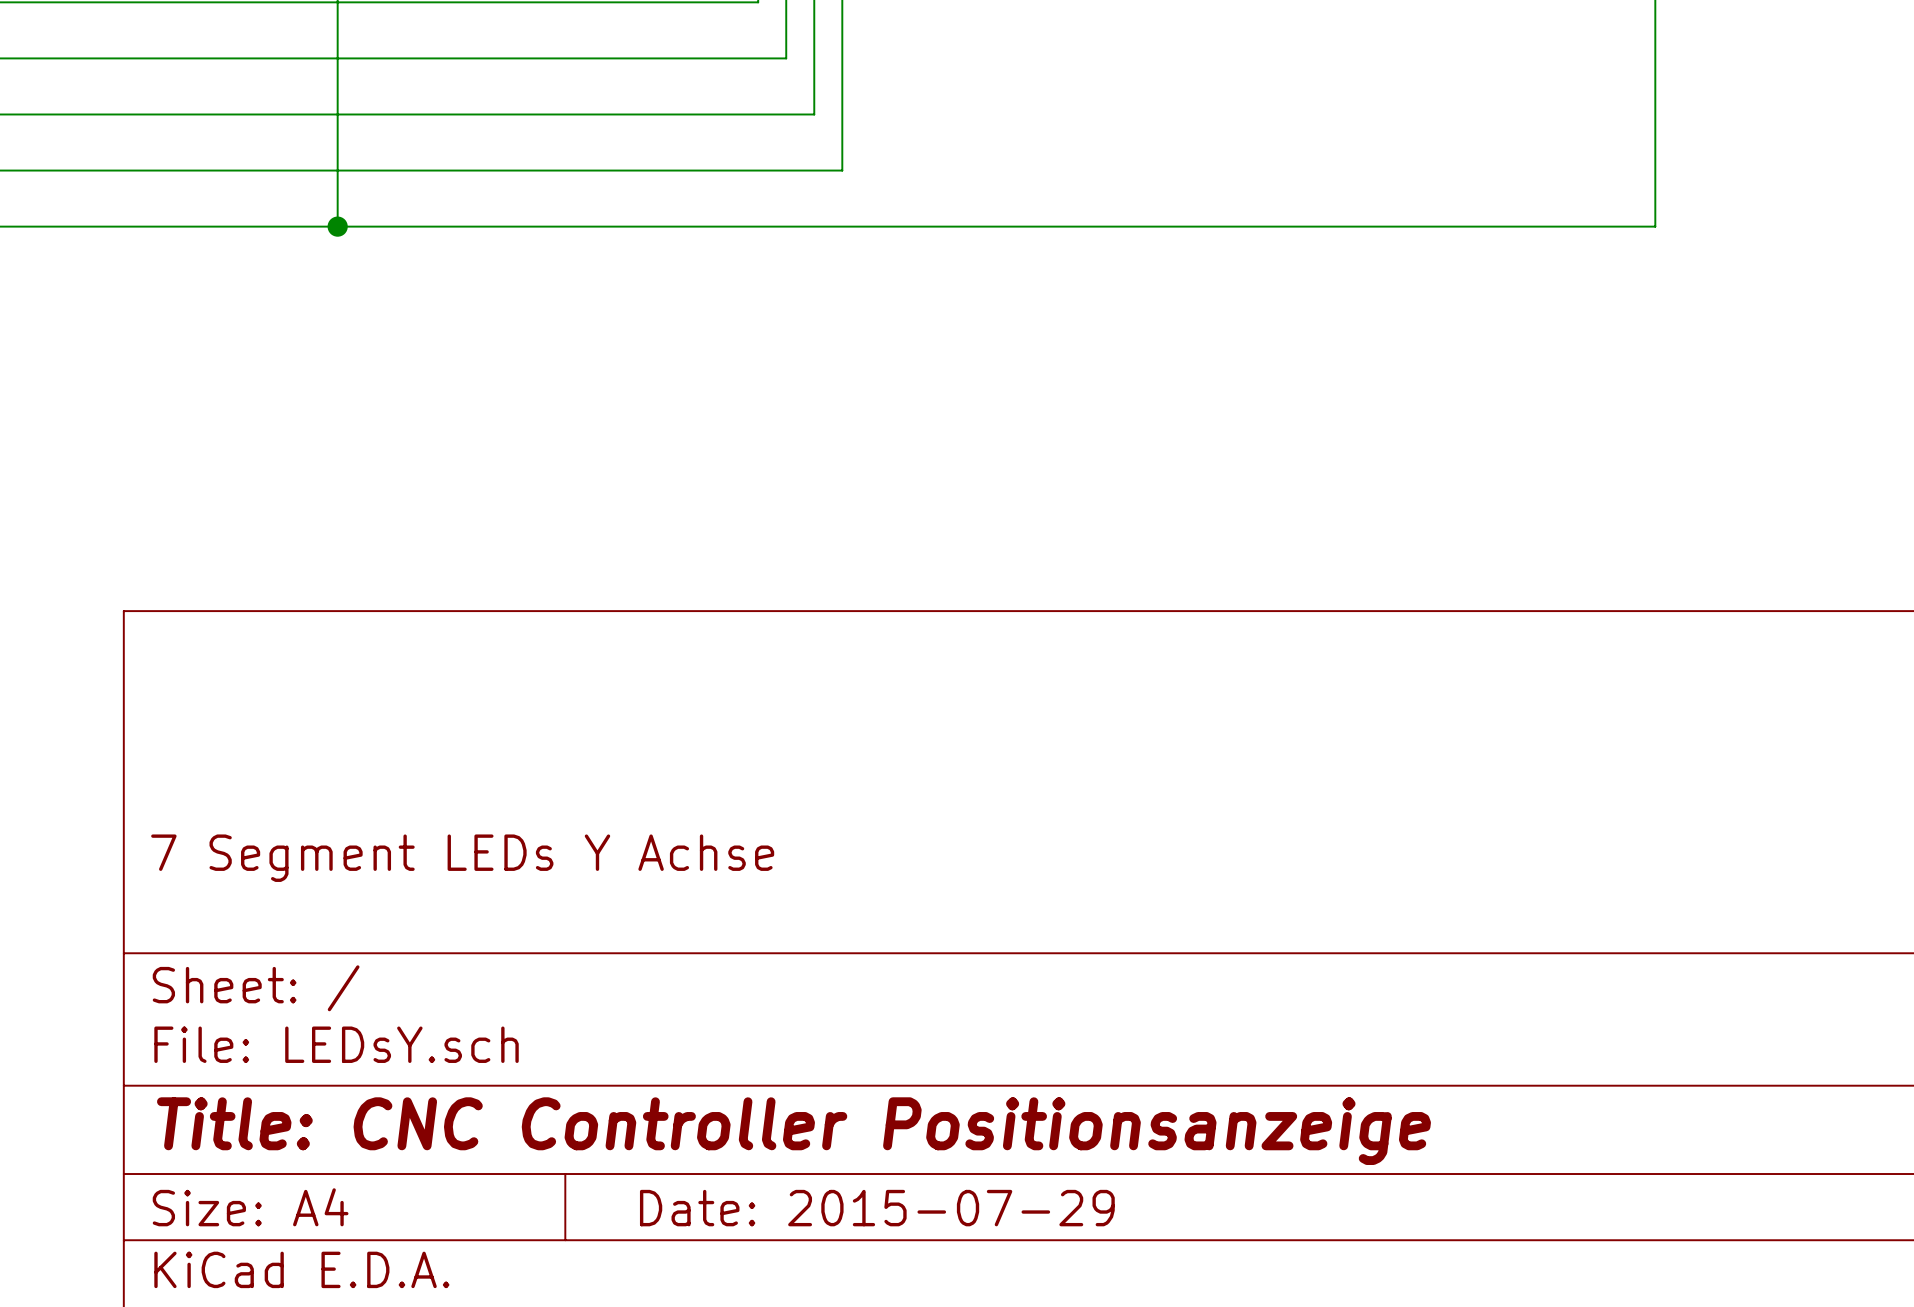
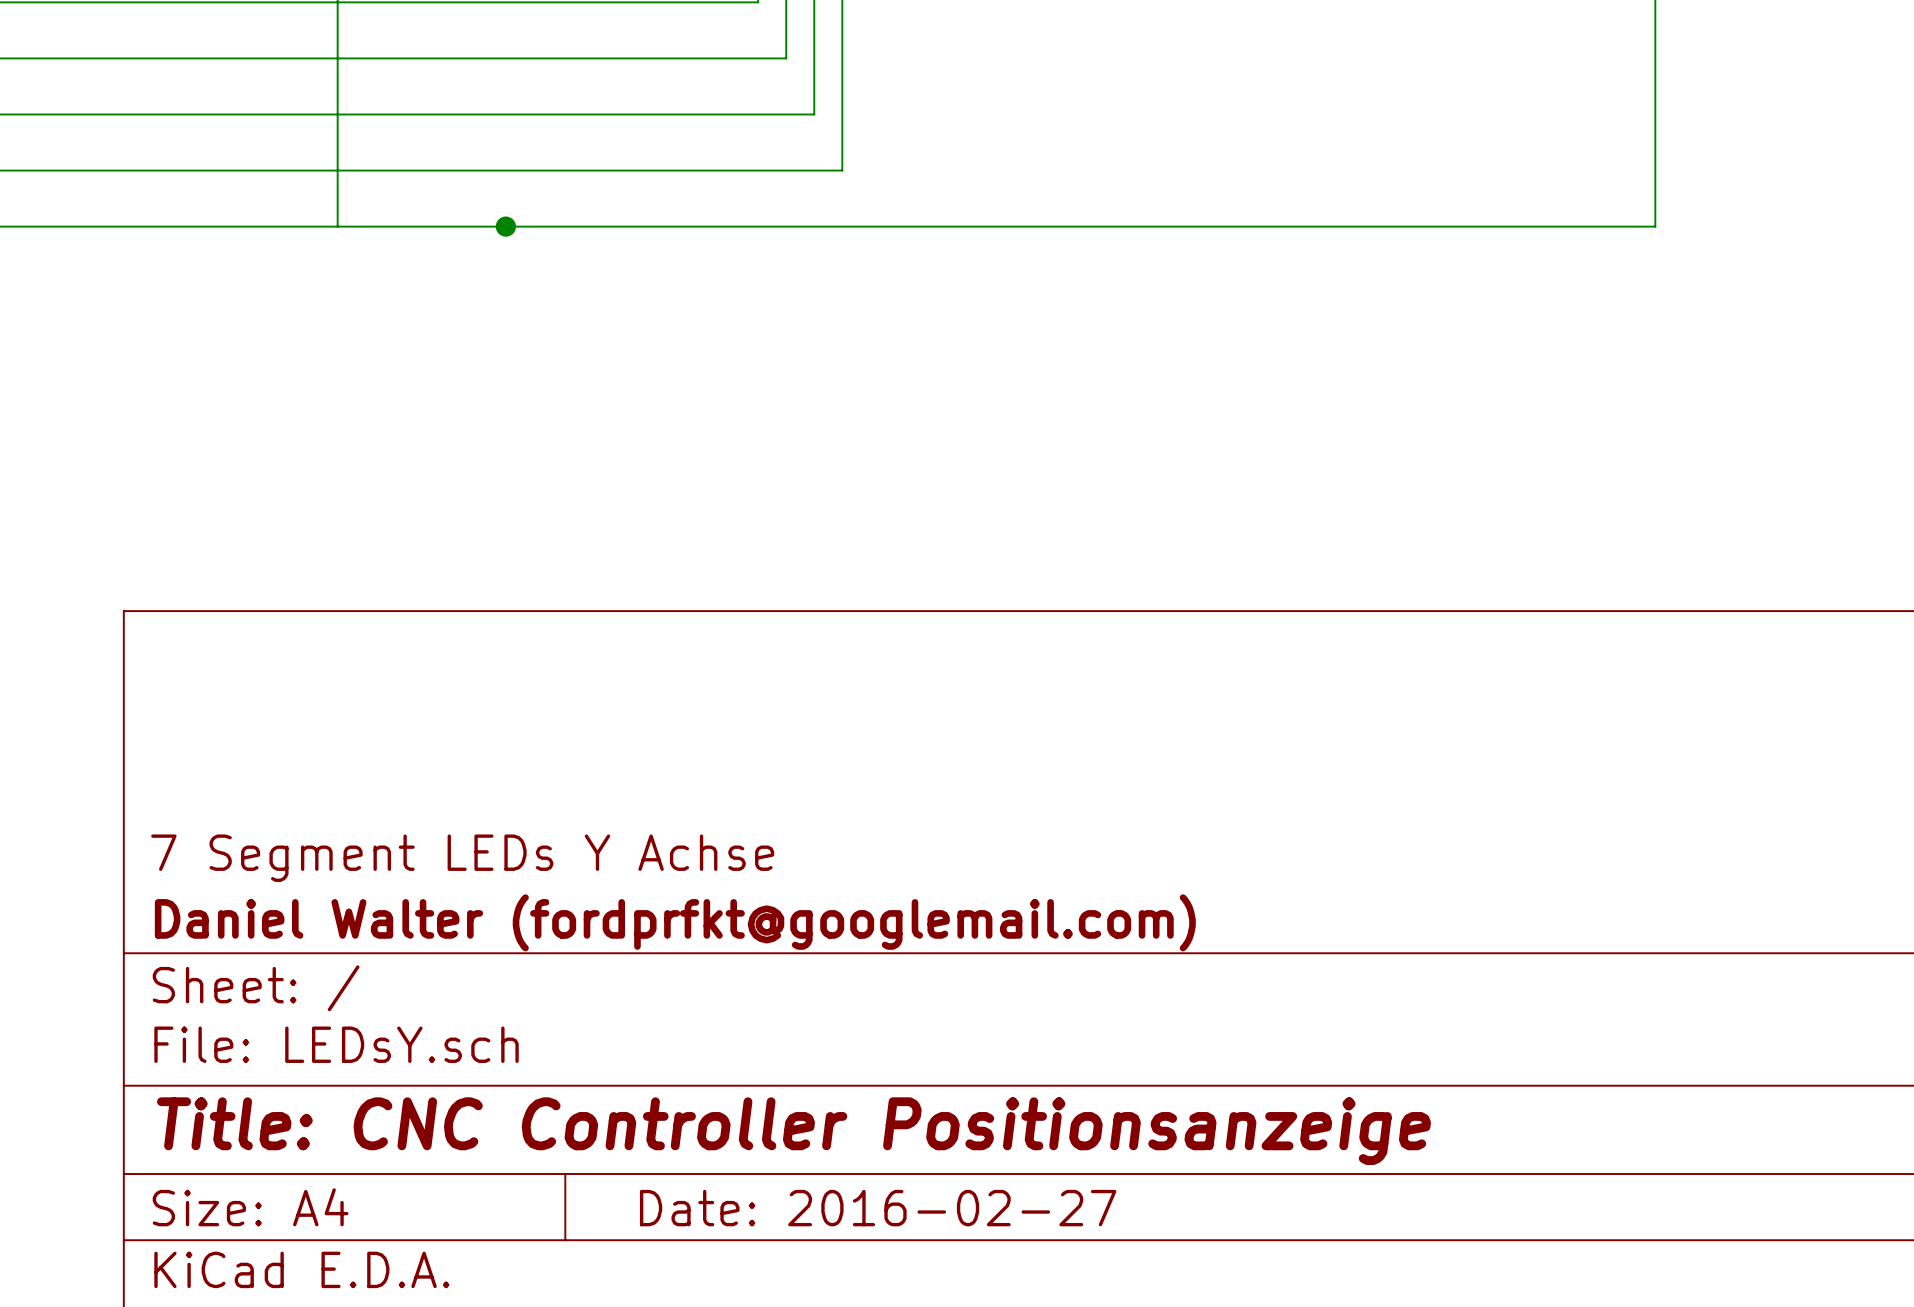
junction: (337, 226) -> none
junction: none -> (505, 226)
title block: none -> Daniel Walter (fordprfkt@googlemail.com) (675, 922)
title block: Date: 2015-07-29 (877, 1208) -> Date: 2016-02-27 (878, 1208)

